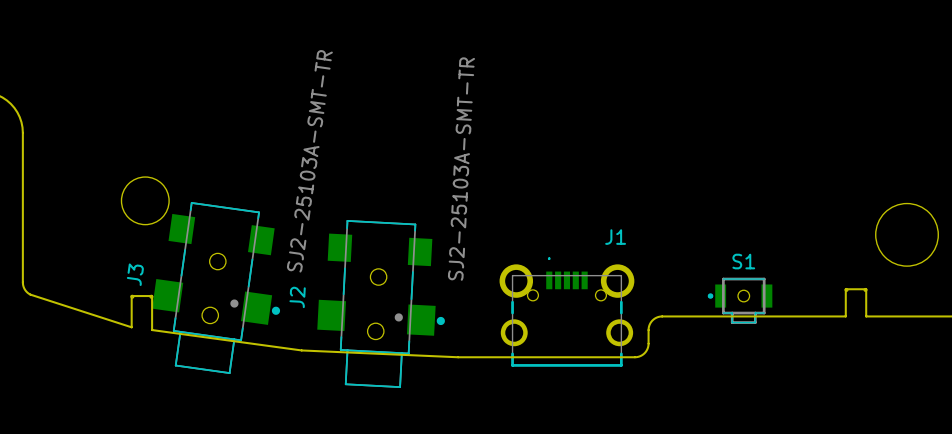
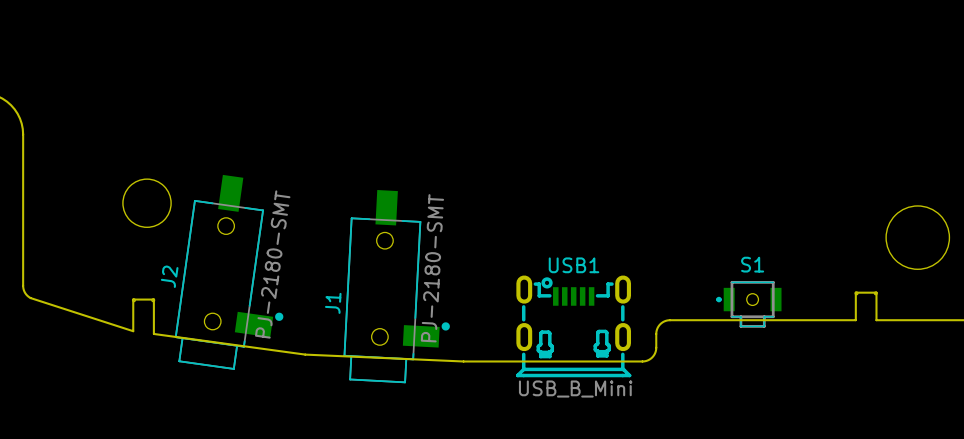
J2 value: SJ2-25103A-SMT-TR (461, 169) -> PJ-2180-SMT (272, 264)
J2 footprint: [317, 220, 445, 388] -> [174, 174, 284, 370]
J1 name position: J1 (615, 237) -> J1 (333, 303)
J1 footprint: [499, 257, 635, 367] -> [343, 190, 450, 384]
J1 value: none -> PJ-2180-SMT (432, 268)
J3: SJ2-25103A-SMT-TR (216, 288) -> none
USB1: none -> USB_B_Mini (573, 326)

